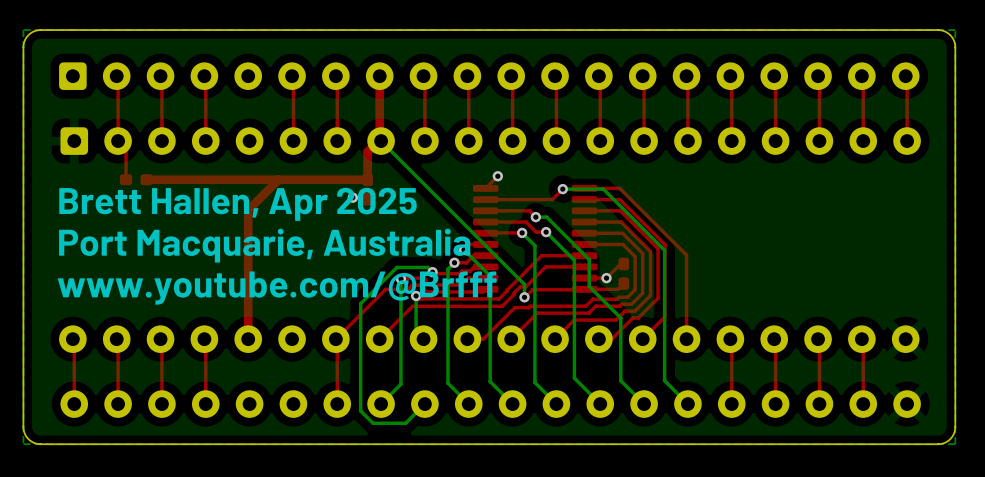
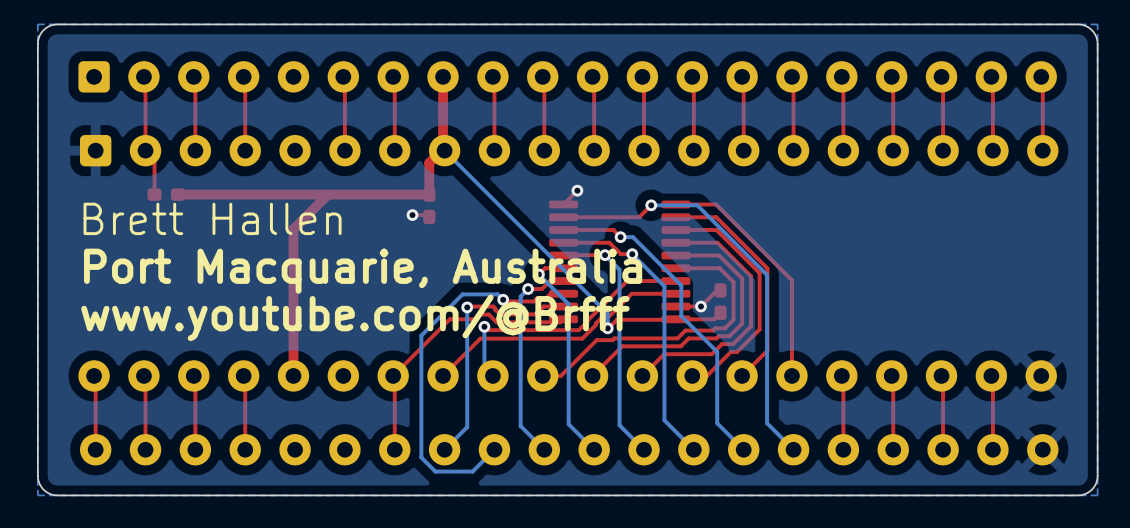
text: Brett Hallen, Apr 2025 (238, 204) -> Brett Hallen (212, 218)

